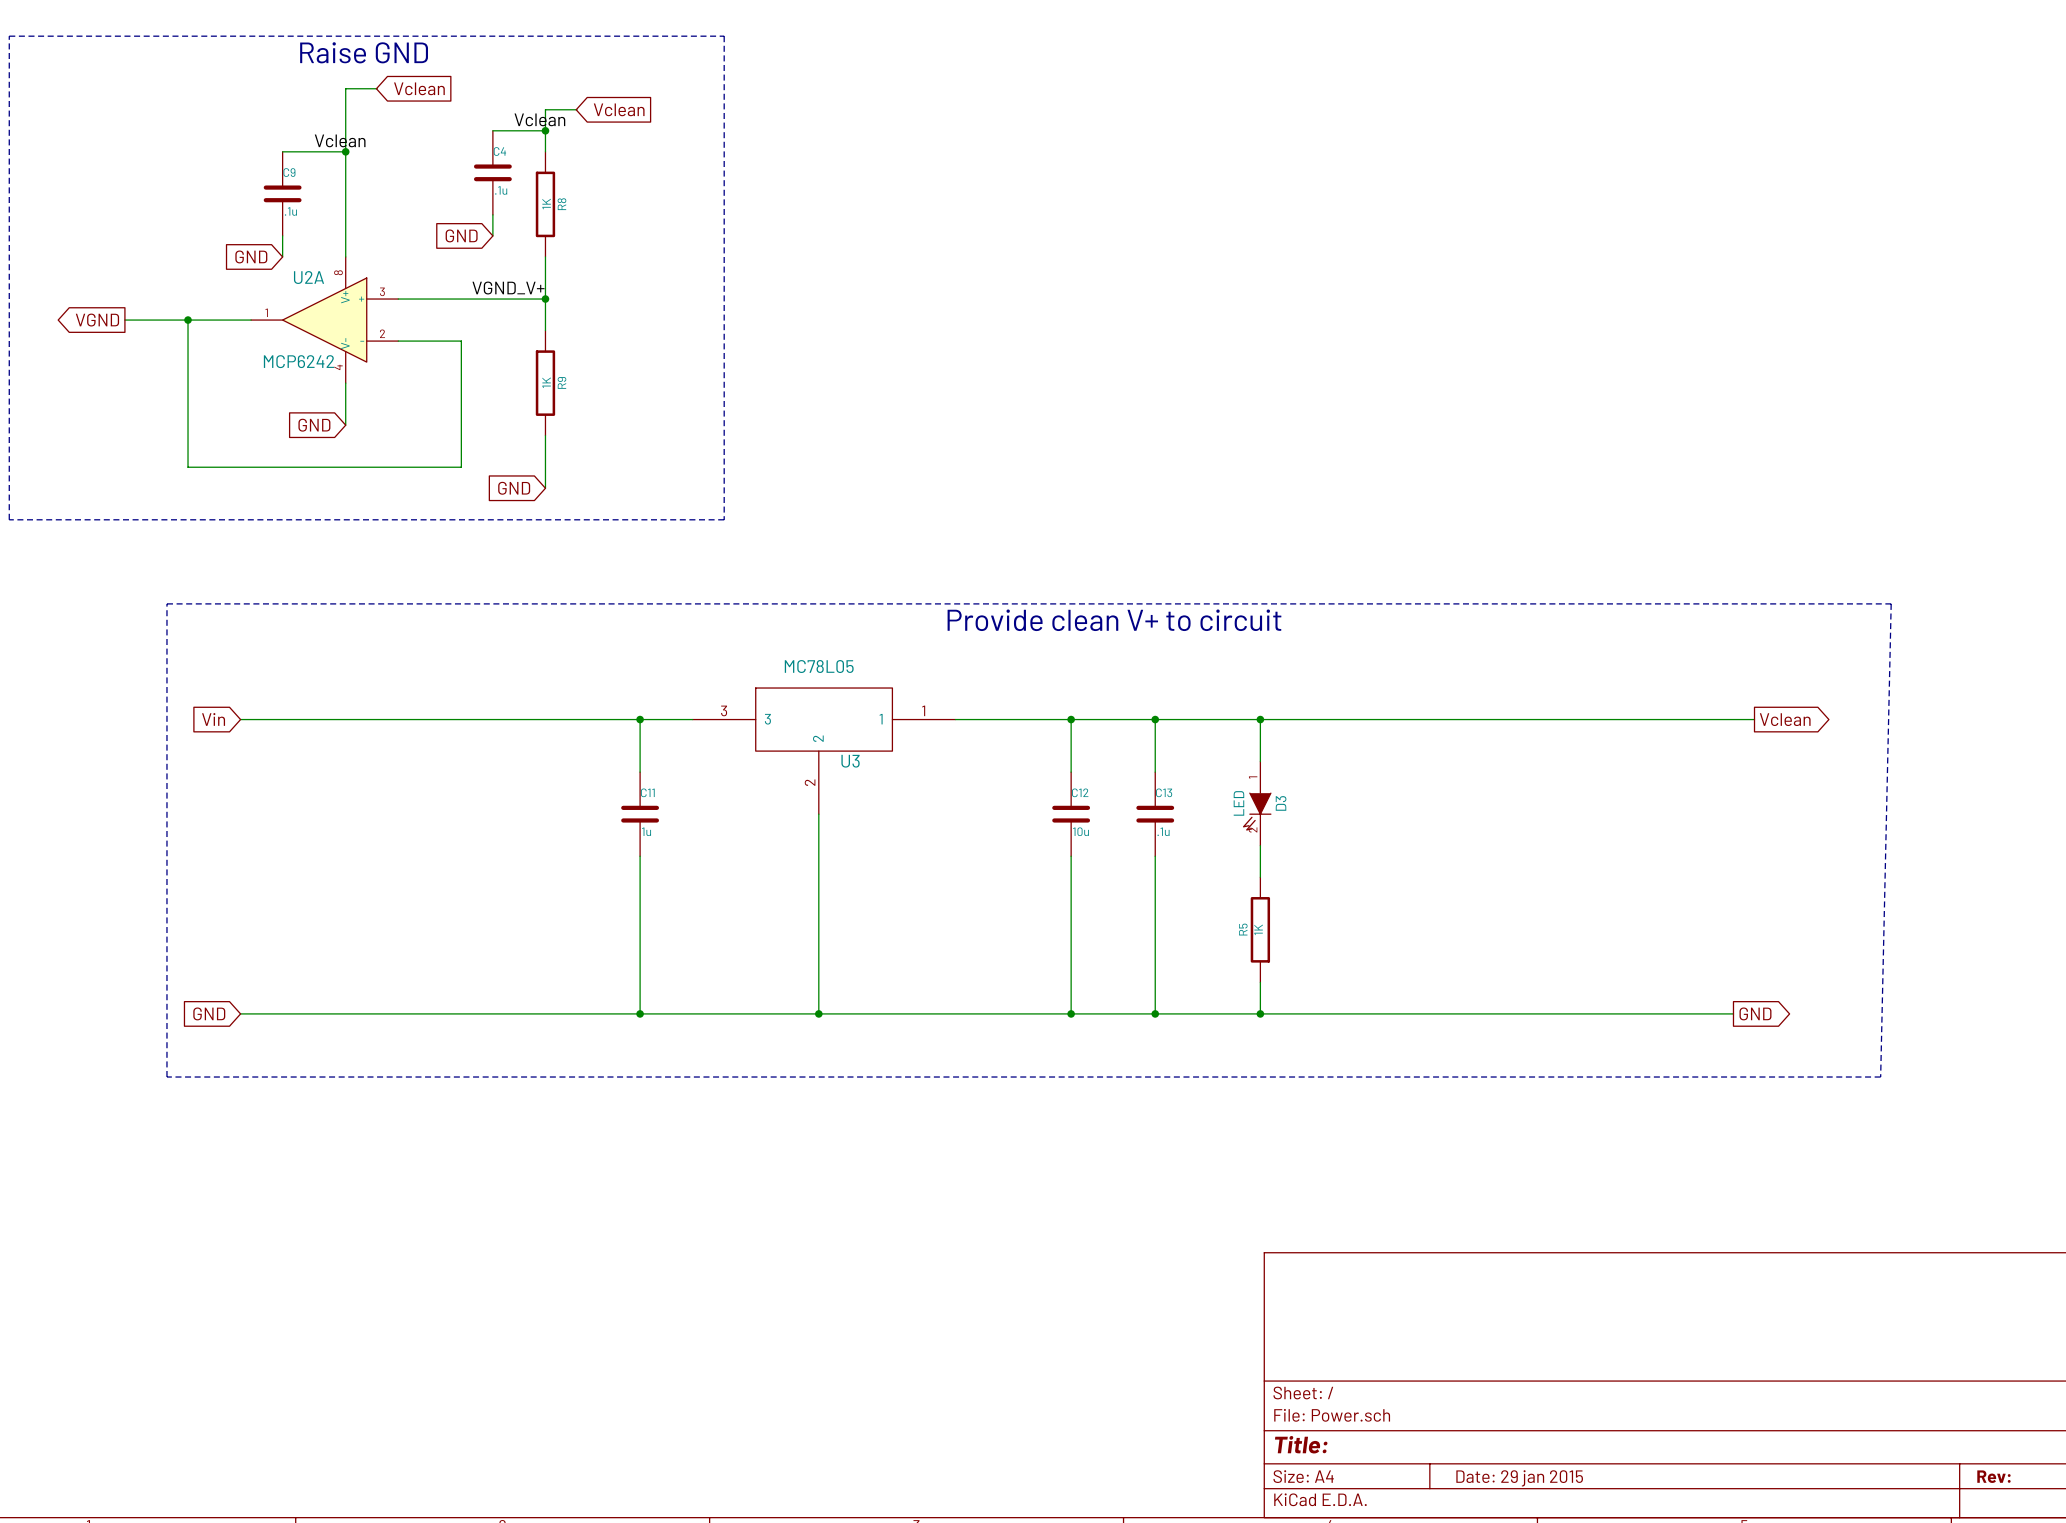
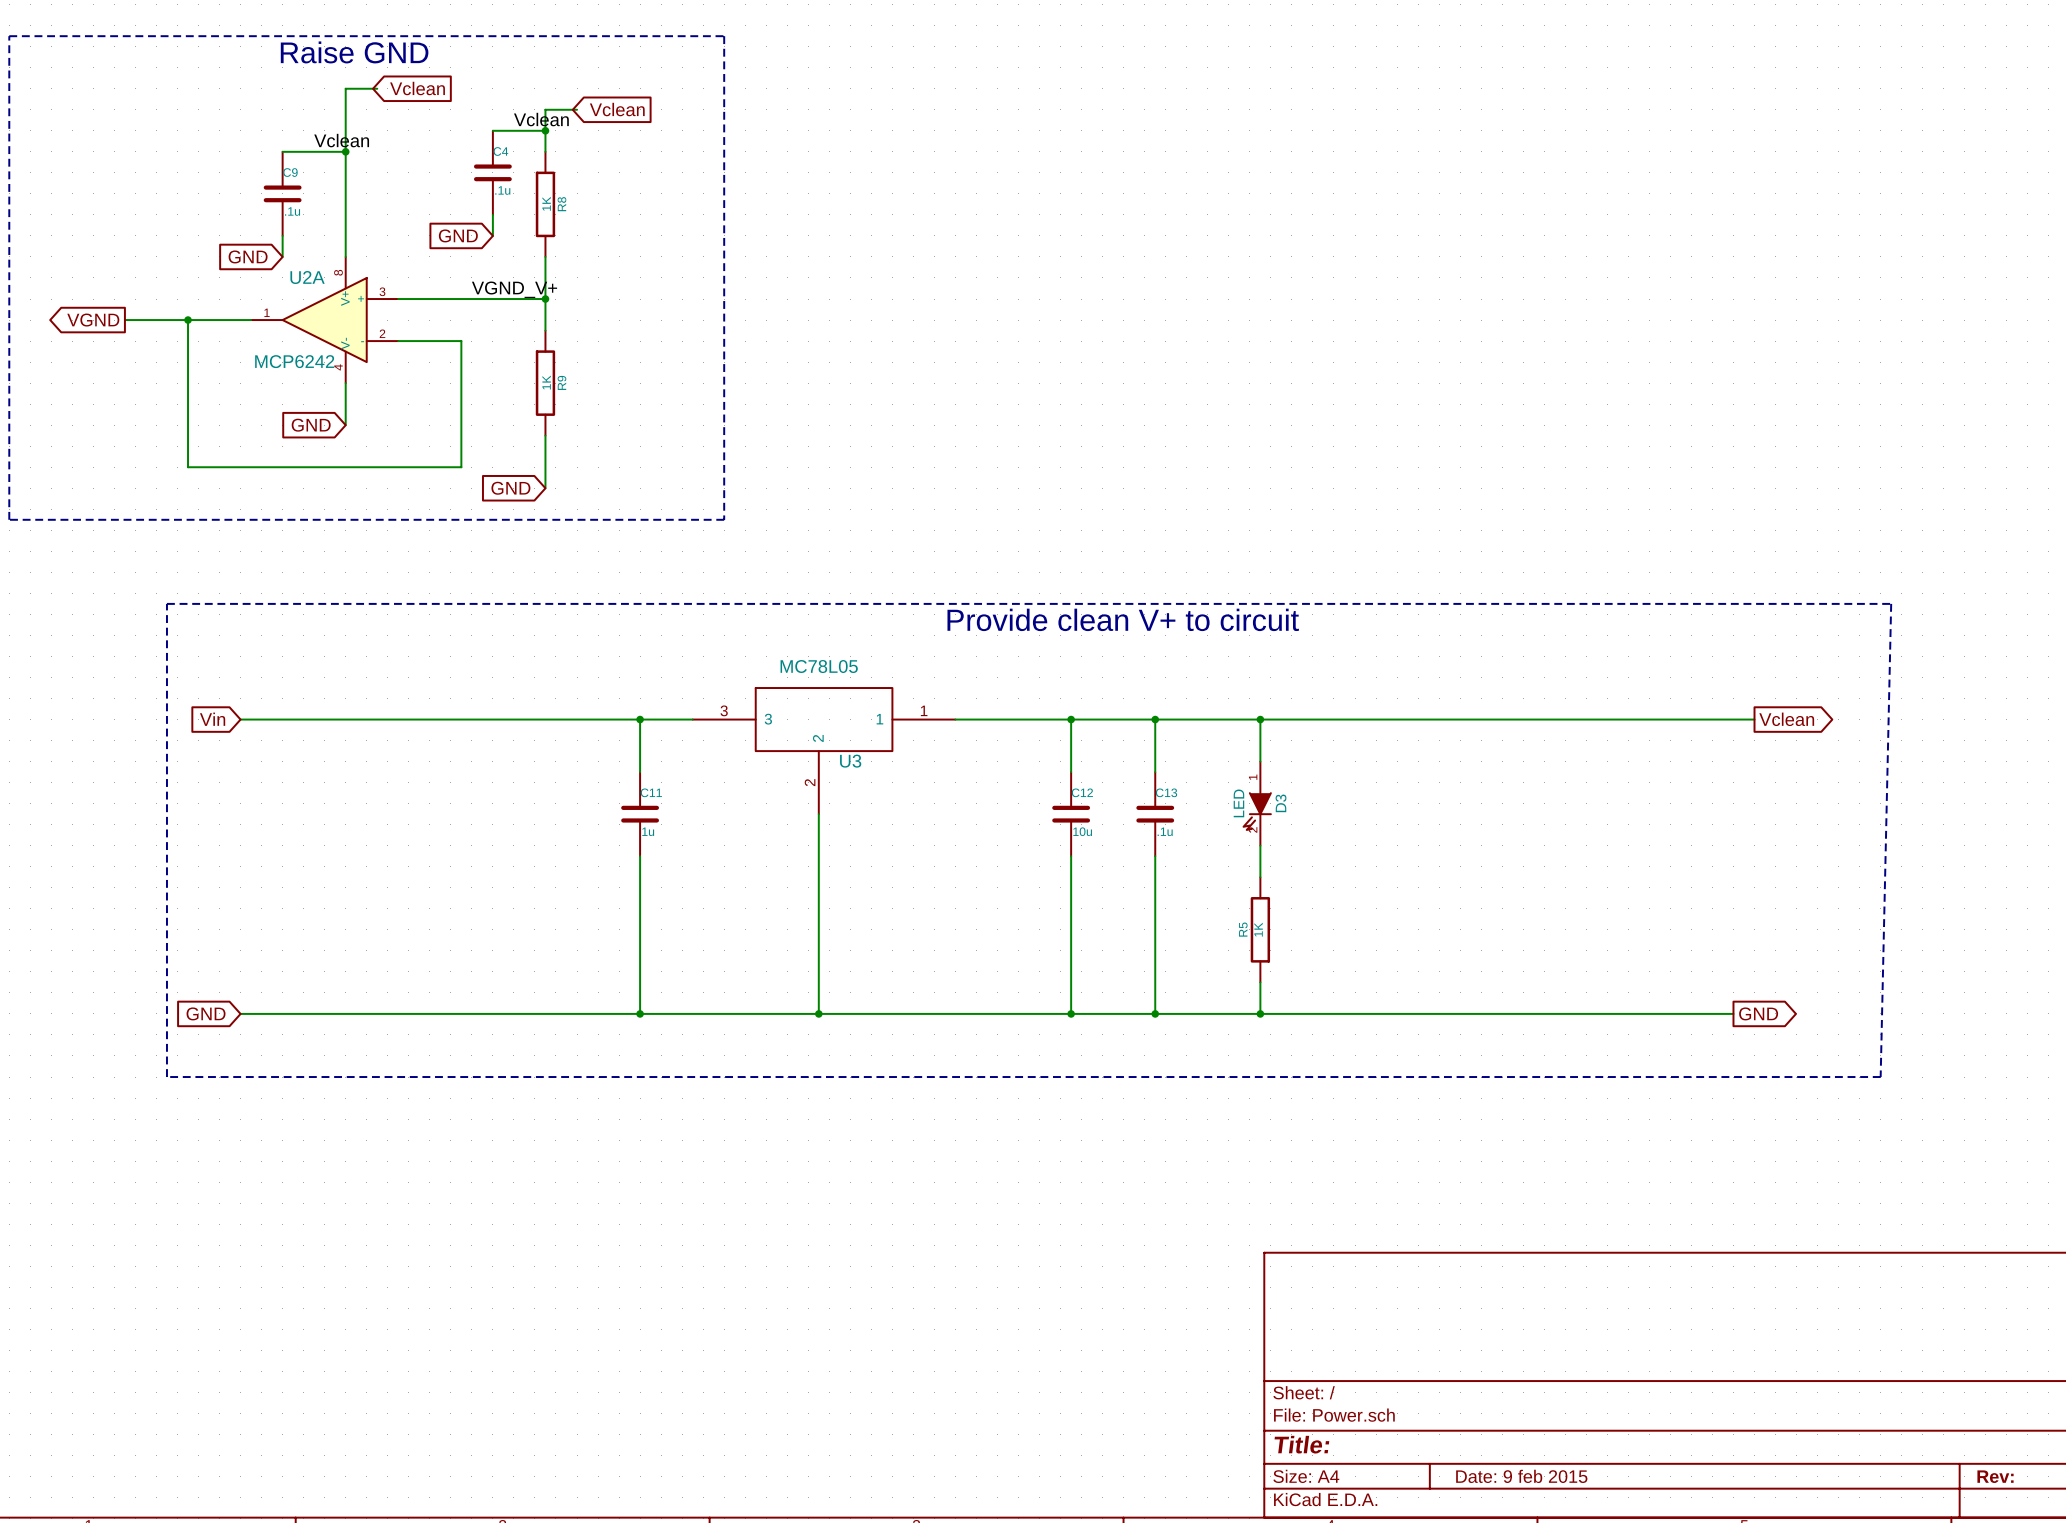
title block: Date: 29 jan 2015 (1519, 1478) -> Date: 9 feb 2015 (1521, 1476)

